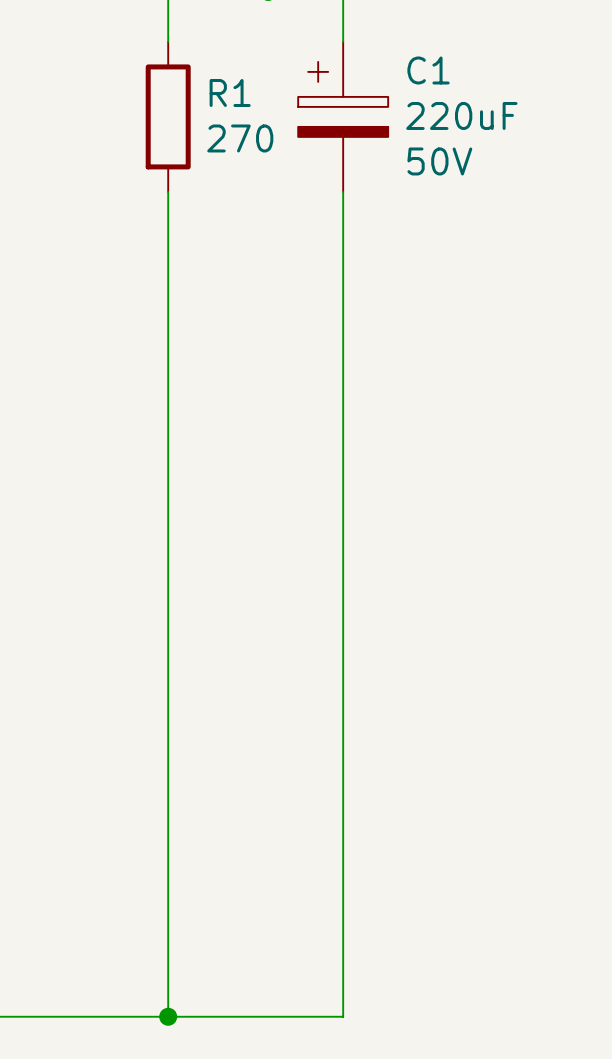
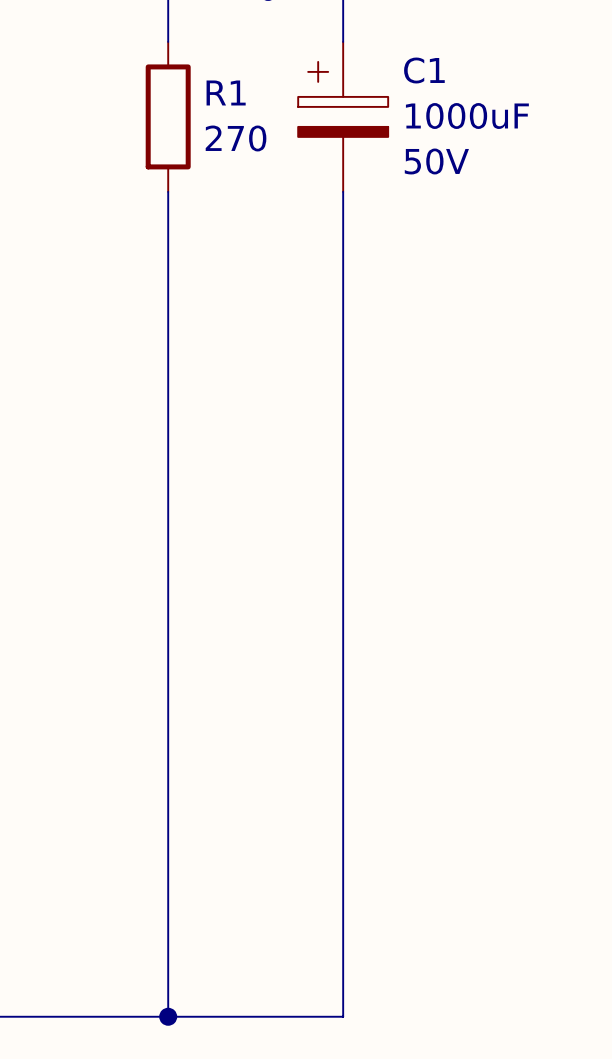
C1 value: 220uF (461, 115) -> 1000uF (467, 116)

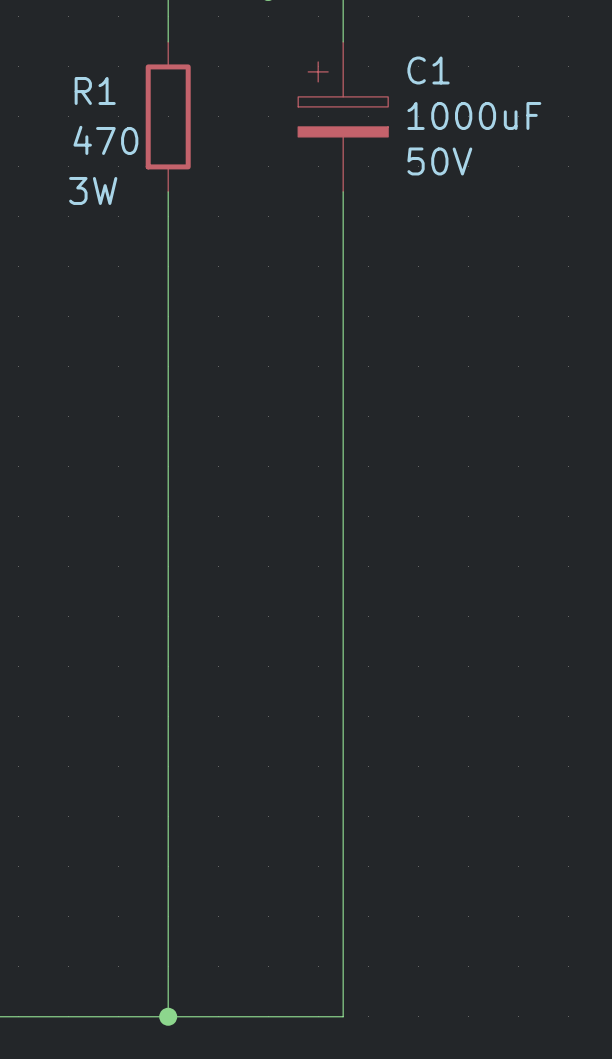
R1 name position: R1 (226, 92) -> R1 (95, 90)
R1 value: 270 (236, 138) -> 470 (105, 140)
R1 text: none -> 3W (93, 190)

